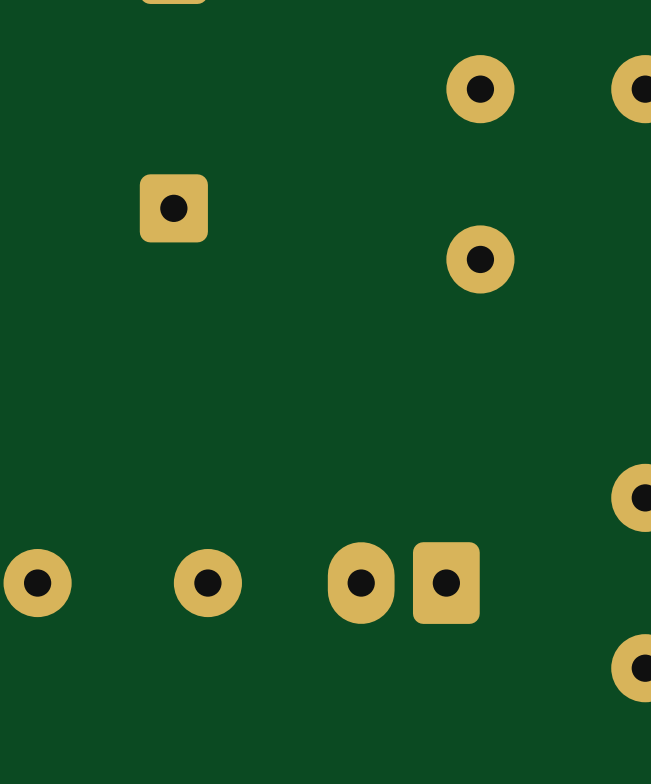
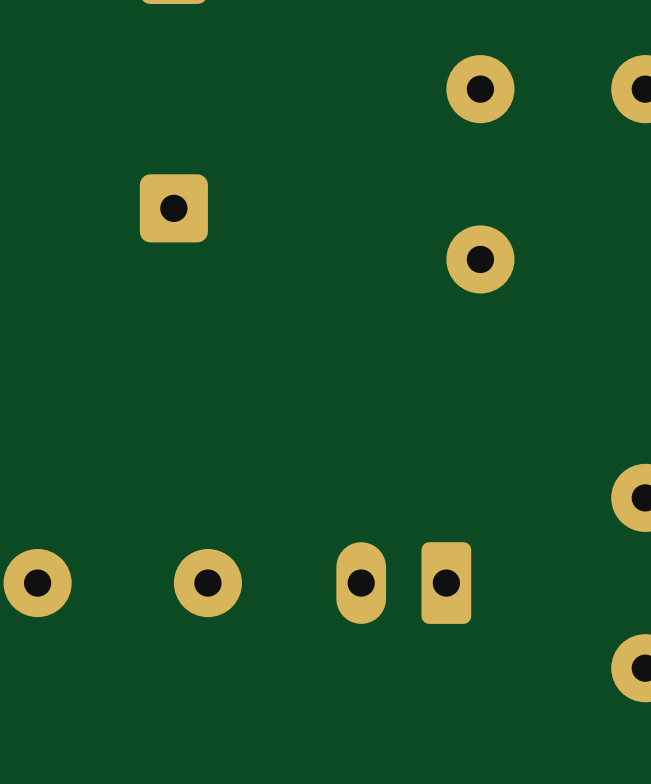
part footprint: [327, 542, 480, 624] -> [336, 542, 472, 624]

